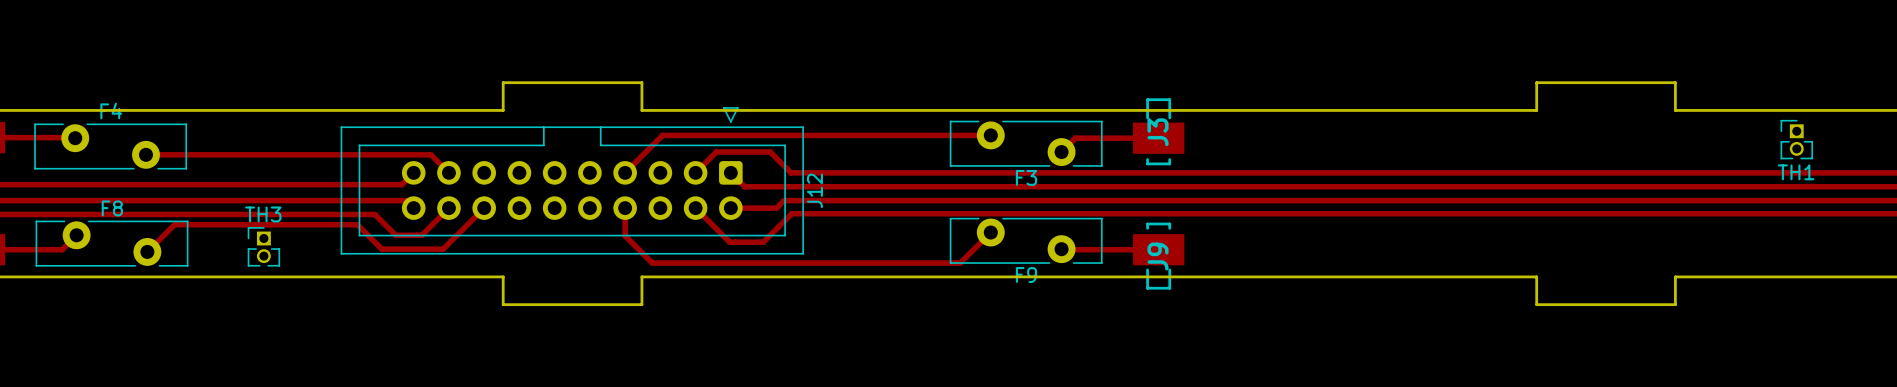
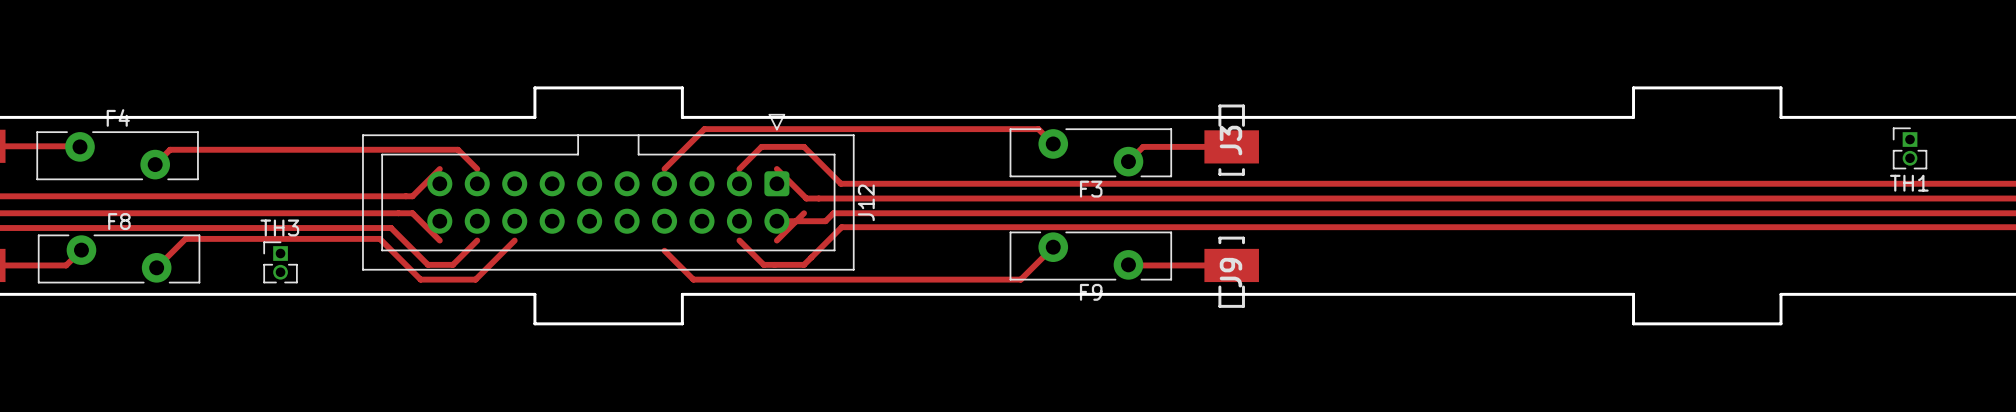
track: (990, 135) (662, 135) (625, 172) -> (1053, 143) (1038, 129) (704, 129) (664, 169)
track: (770, 152) (716, 152) (695, 172) -> (818, 161) (804, 146) (761, 146) (739, 169)
track: (145, 154) (430, 154) (448, 172) -> (155, 164) (170, 149) (458, 149) (477, 169)
track: (413, 172) (401, 184) (388, 184) -> (439, 169) (412, 196)
track: (730, 172) (744, 186) (758, 186) -> (776, 169) (806, 198)
track: (388, 200) (406, 200) (413, 208) -> (412, 213) (439, 240)
track: none -> (804, 213) (776, 240)
track: (448, 208) (421, 235) (395, 235) (374, 214) (367, 214) -> none
track: (484, 208) (443, 249) (426, 249) -> (477, 240) (452, 264)
track: (625, 208) (625, 235) -> none
track: (695, 208) (729, 242) (763, 242) -> (739, 240) (763, 264) (804, 264) (811, 257)
track: none -> (514, 240) (475, 279) (420, 279) (405, 264)
track: (381, 249) (402, 249) -> (391, 228) (428, 264)

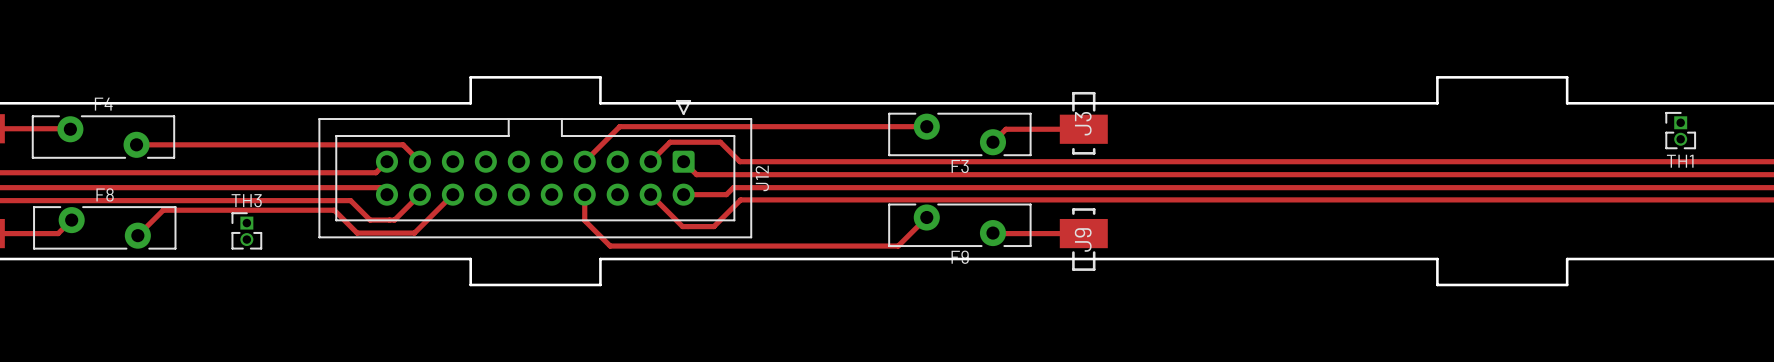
track: (1053, 143) (1038, 129) (704, 129) (664, 169) -> (926, 126) (619, 126) (584, 161)
track: (818, 161) (804, 146) (761, 146) (739, 169) -> (720, 142) (670, 142) (650, 161)
track: (155, 164) (170, 149) (458, 149) (477, 169) -> (136, 144) (403, 144) (419, 161)
track: (439, 169) (412, 196) -> (386, 161) (375, 172) (362, 172)
track: (776, 169) (806, 198) -> (683, 161) (696, 174) (709, 174)
track: (412, 213) (439, 240) -> (362, 187) (379, 187) (386, 194)
track: (804, 213) (776, 240) -> none
track: none -> (419, 194) (394, 220) (370, 220) (350, 200) (344, 200)
track: none -> (584, 194) (584, 220)
track: (391, 228) (428, 264) -> (357, 233) (376, 233)
track: (477, 240) (452, 264) -> (452, 194) (414, 233) (398, 233)
track: (514, 240) (475, 279) (420, 279) (405, 264) -> none
track: (739, 240) (763, 264) (804, 264) (811, 257) -> (650, 194) (682, 226) (713, 226)

